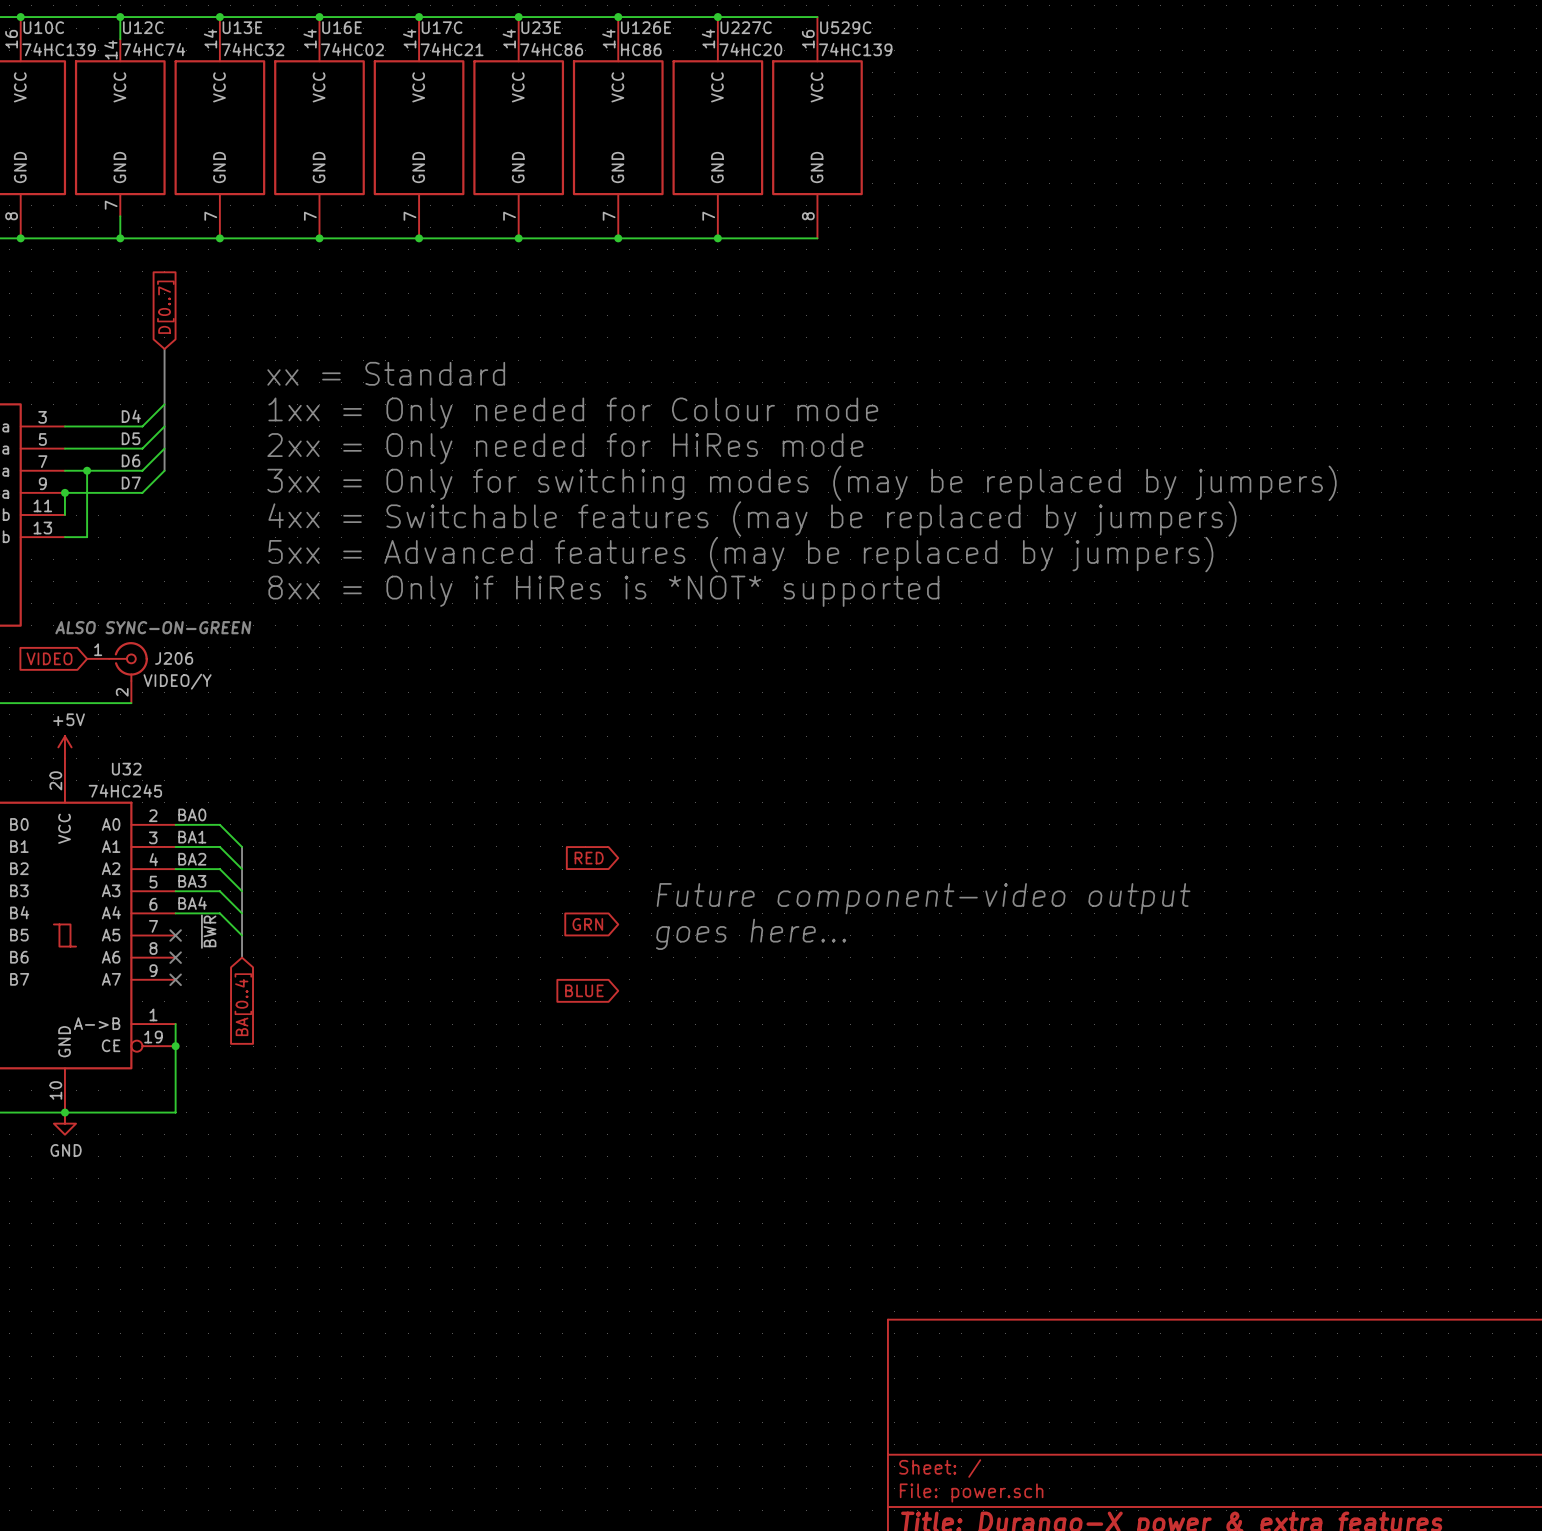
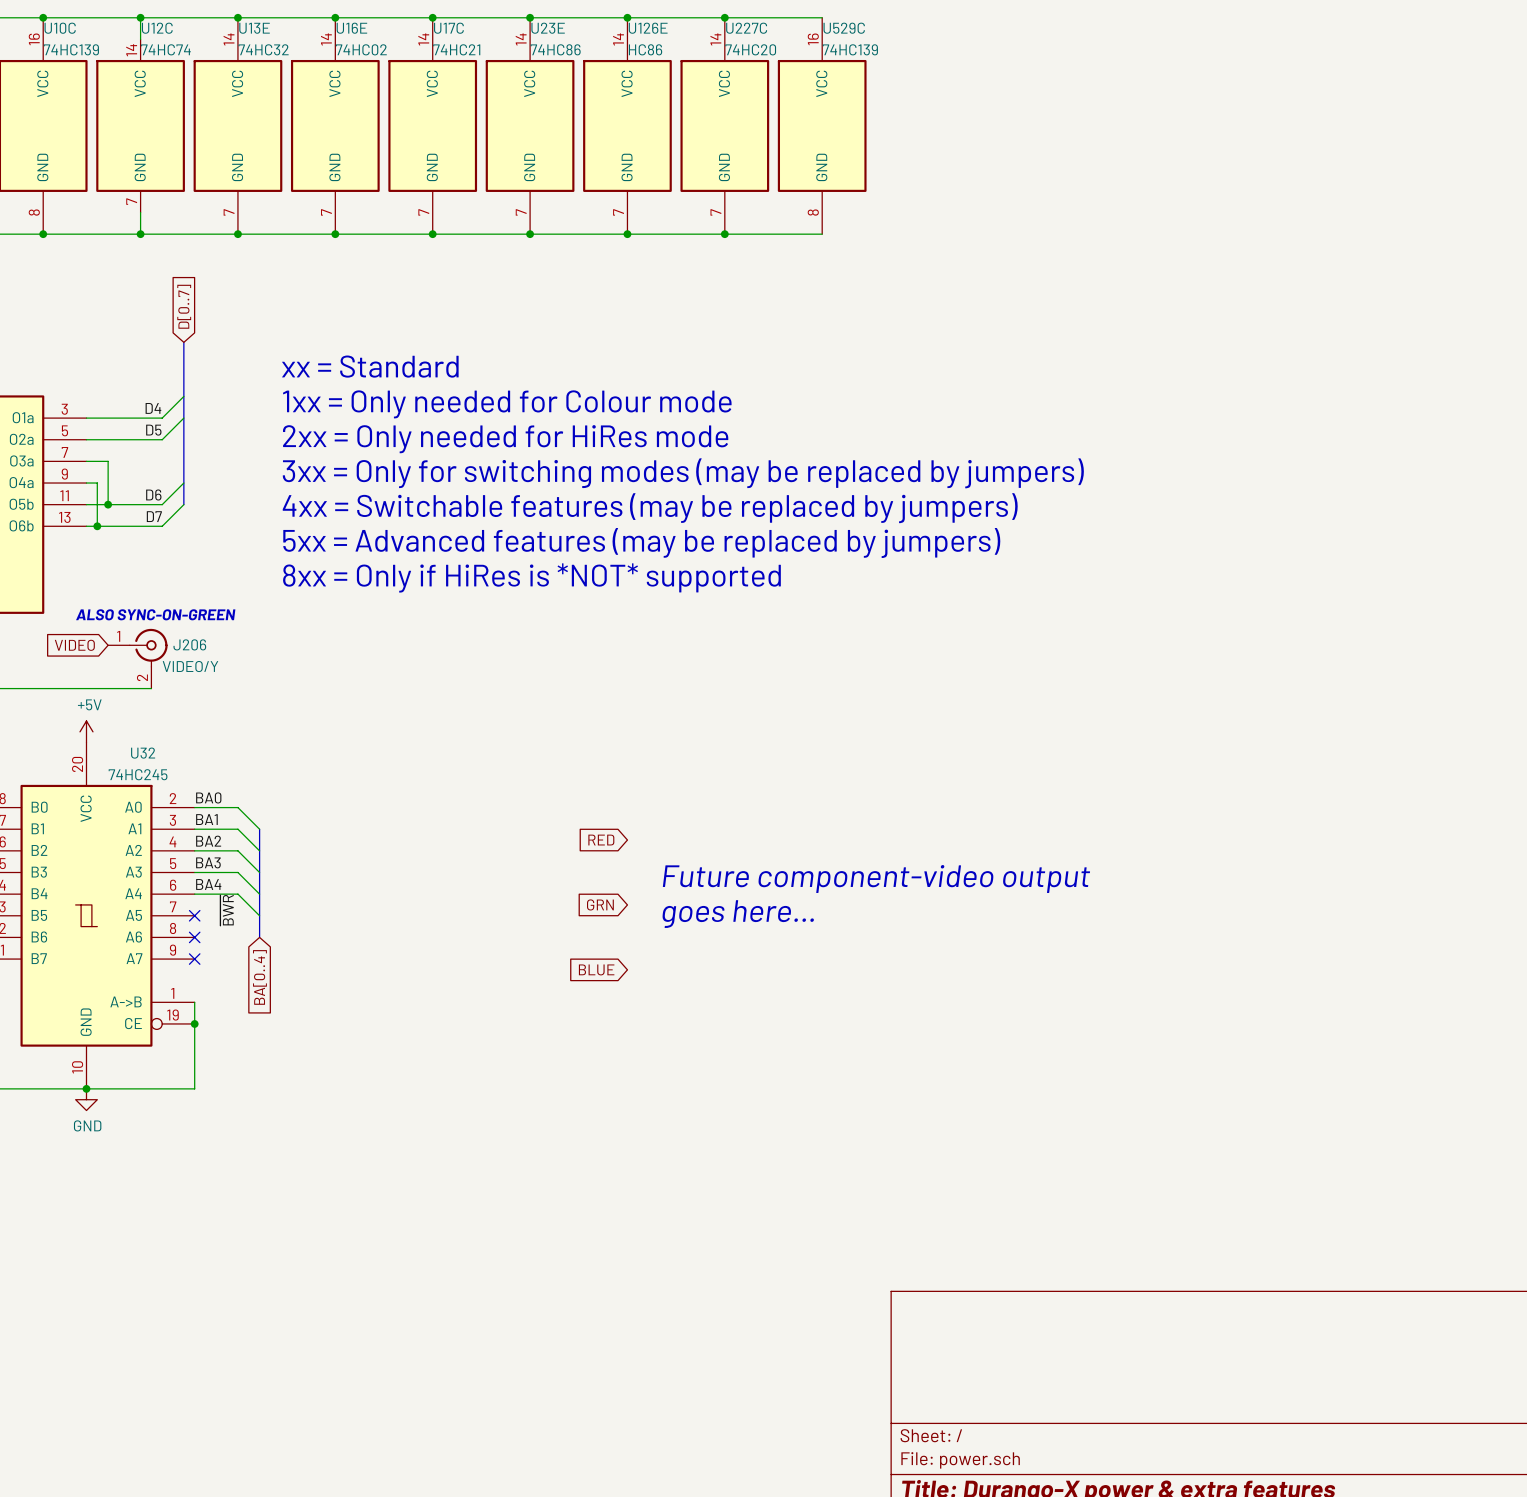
wire: (164, 448) (142, 470) (87, 470) -> none
label position: D6 (131, 460) -> D6 (153, 494)
junction: (87, 470) -> none
wire: (164, 470) (142, 492) (76, 492) -> (97, 526) (97, 483)
bus: none -> (183, 461) (183, 504)
label position: D7 (131, 483) -> D7 (154, 516)
wire: (64, 492) (64, 515) -> (183, 483) (162, 504) (86, 504)
junction: (64, 492) -> none
wire: (87, 515) (87, 537) -> (183, 504) (162, 526) (108, 526)
junction: none -> (108, 504)
junction: none -> (97, 526)

